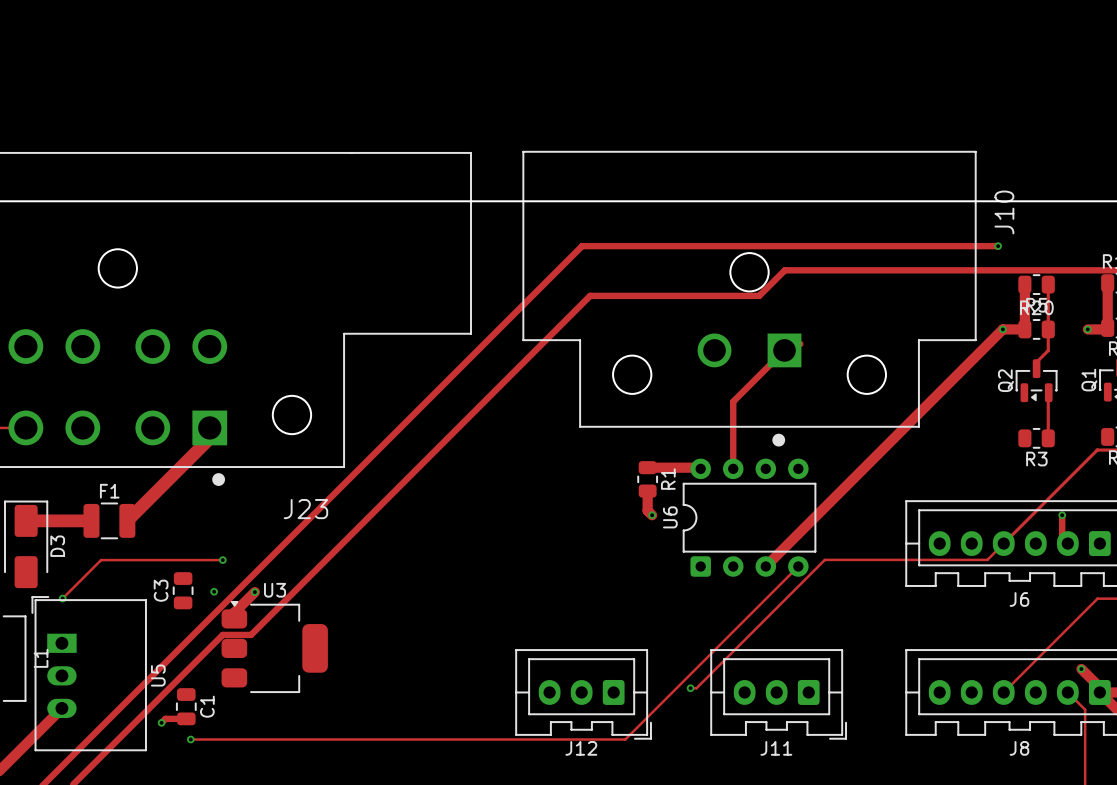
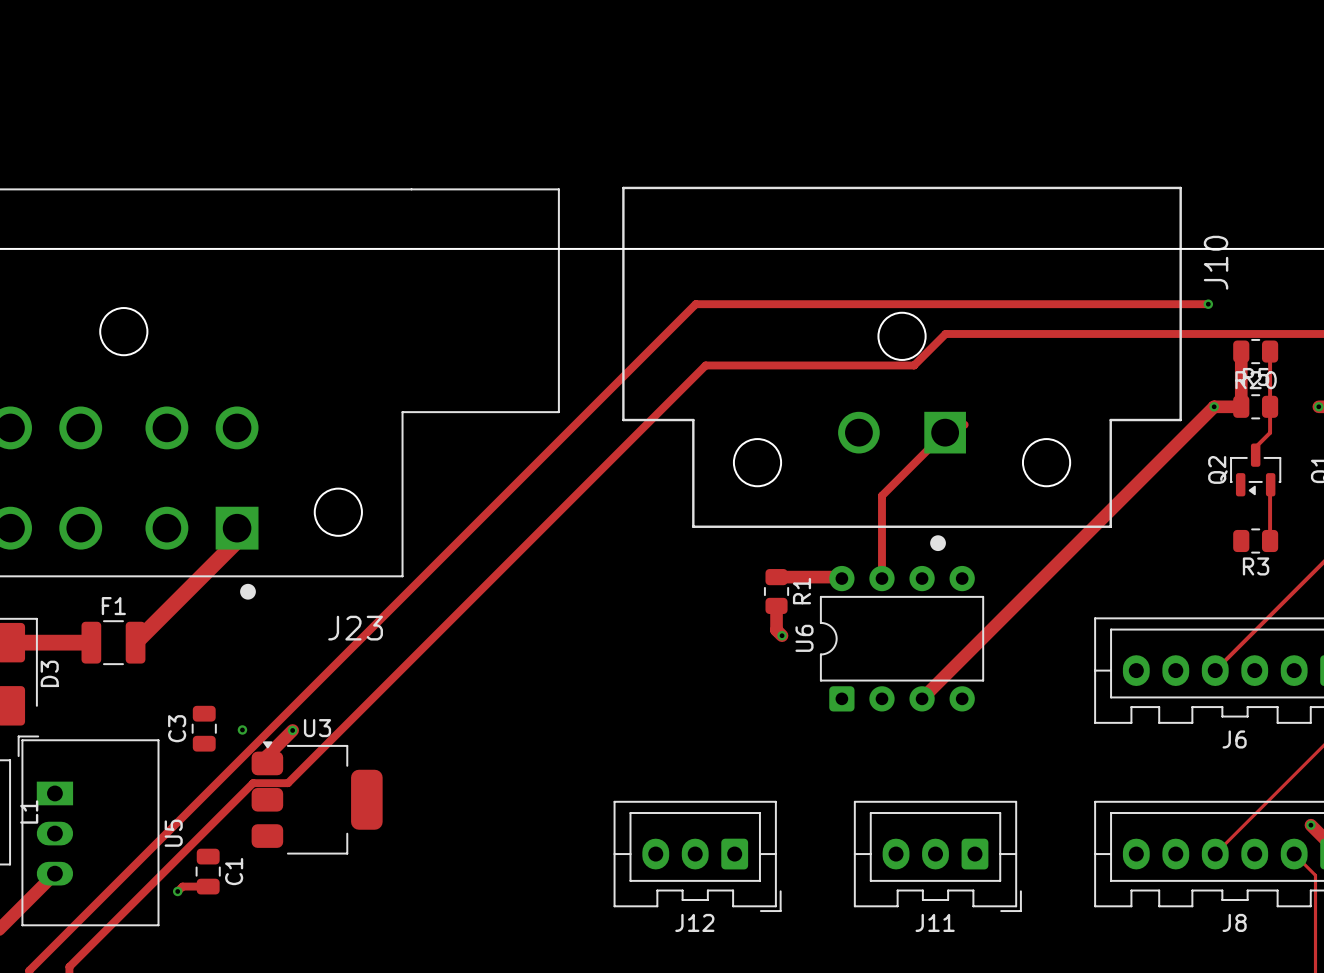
track: (1062, 515) (1062, 537) (1067, 543) -> none
via: (1062, 515) -> none
track: (1003, 543) (987, 559) (824, 559) (696, 688) (690, 688) -> none
track: (222, 560) (101, 560) (62, 598) -> none
via: (222, 560) -> none
track: (798, 566) (625, 739) (190, 739) -> none
via: (62, 598) -> none
via: (690, 688) -> none
via: (190, 739) -> none

